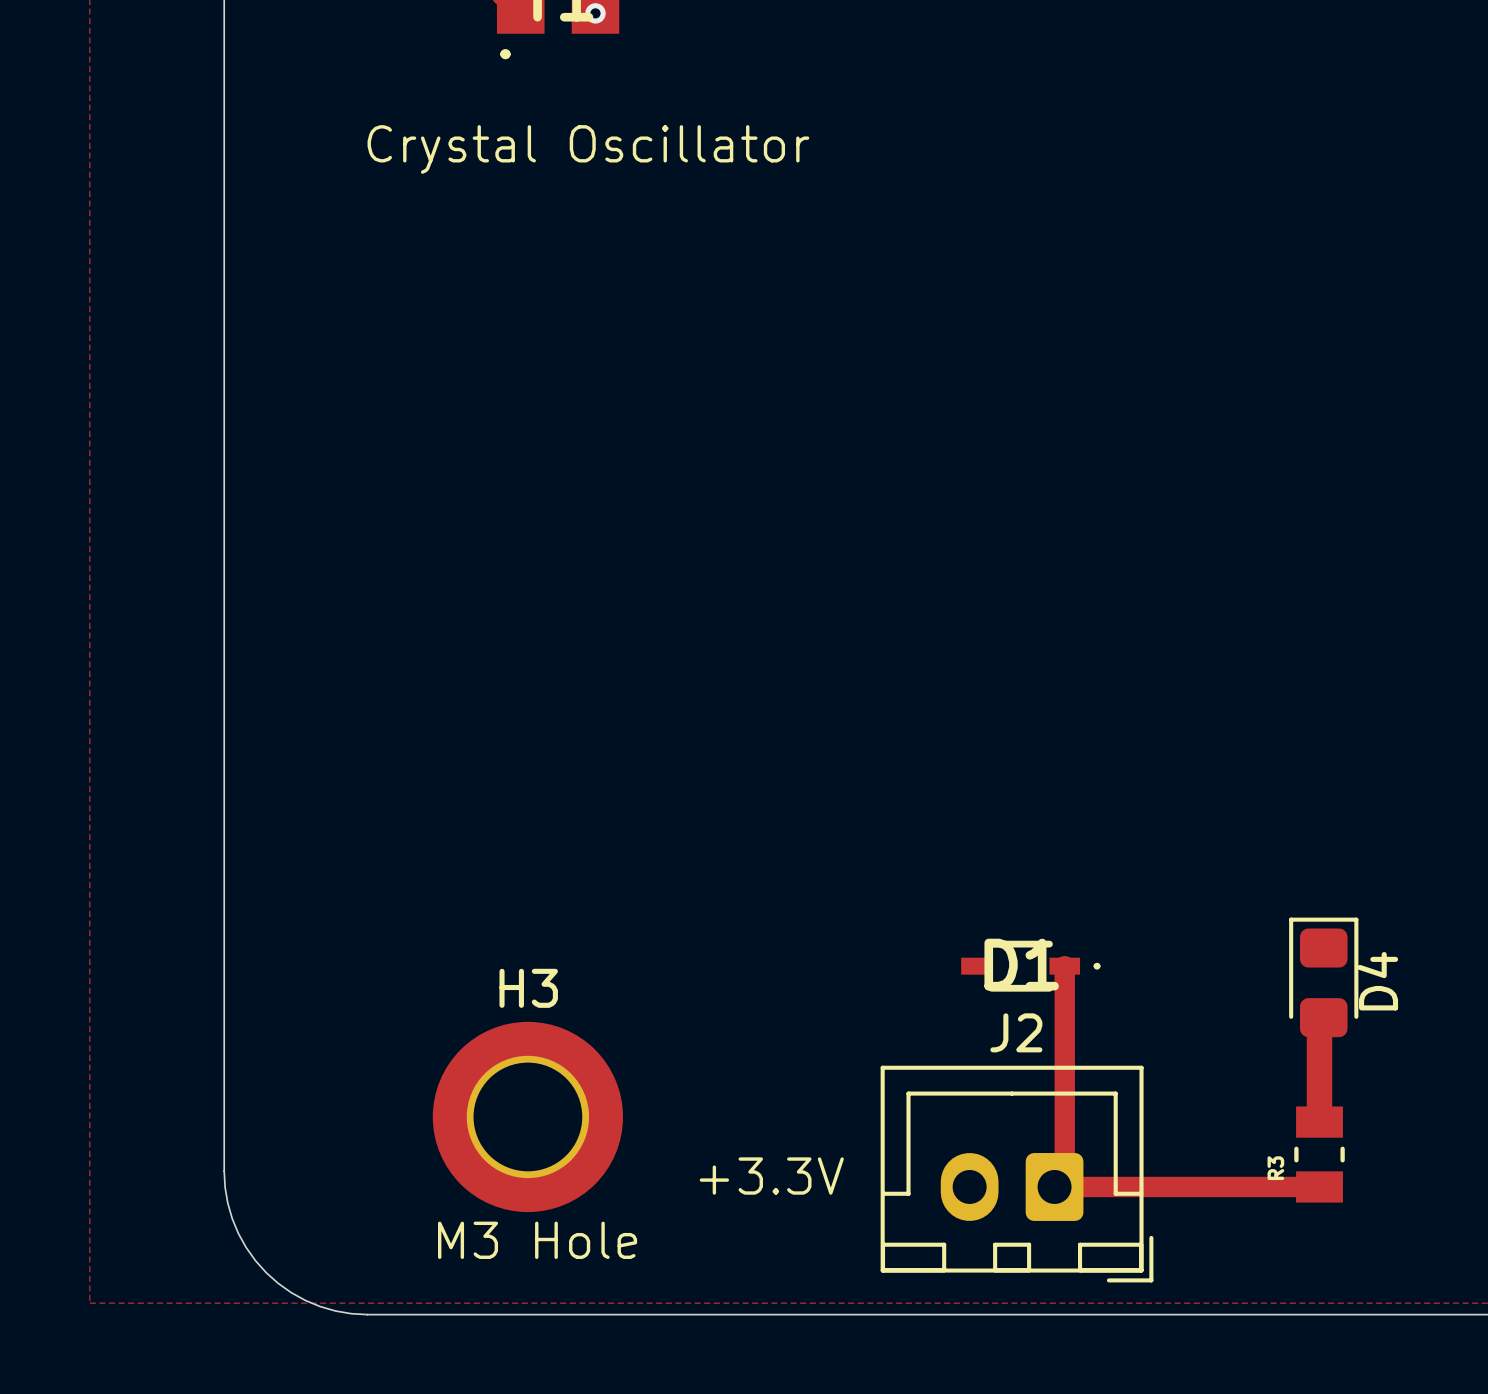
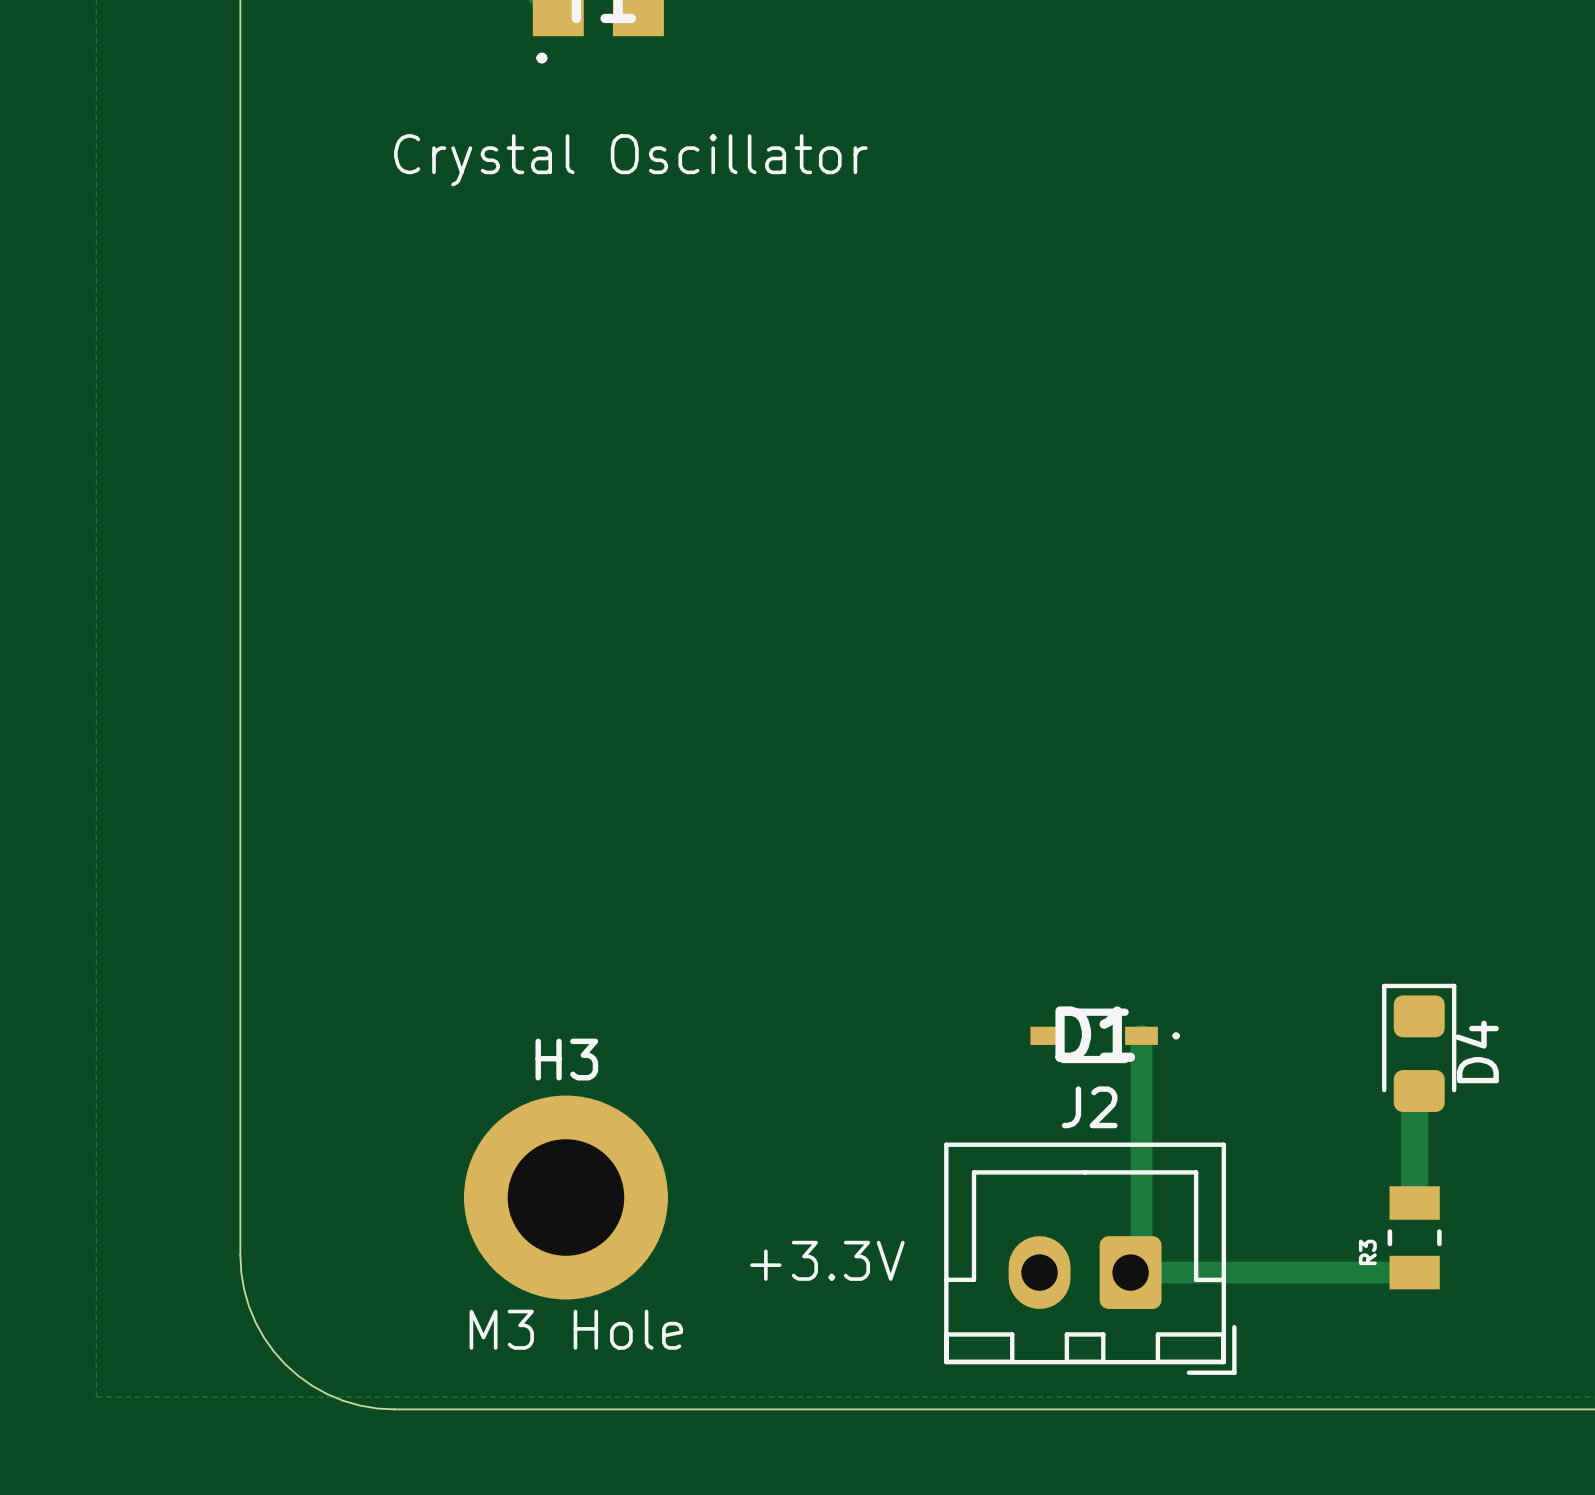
via: (595, 13) -> none

